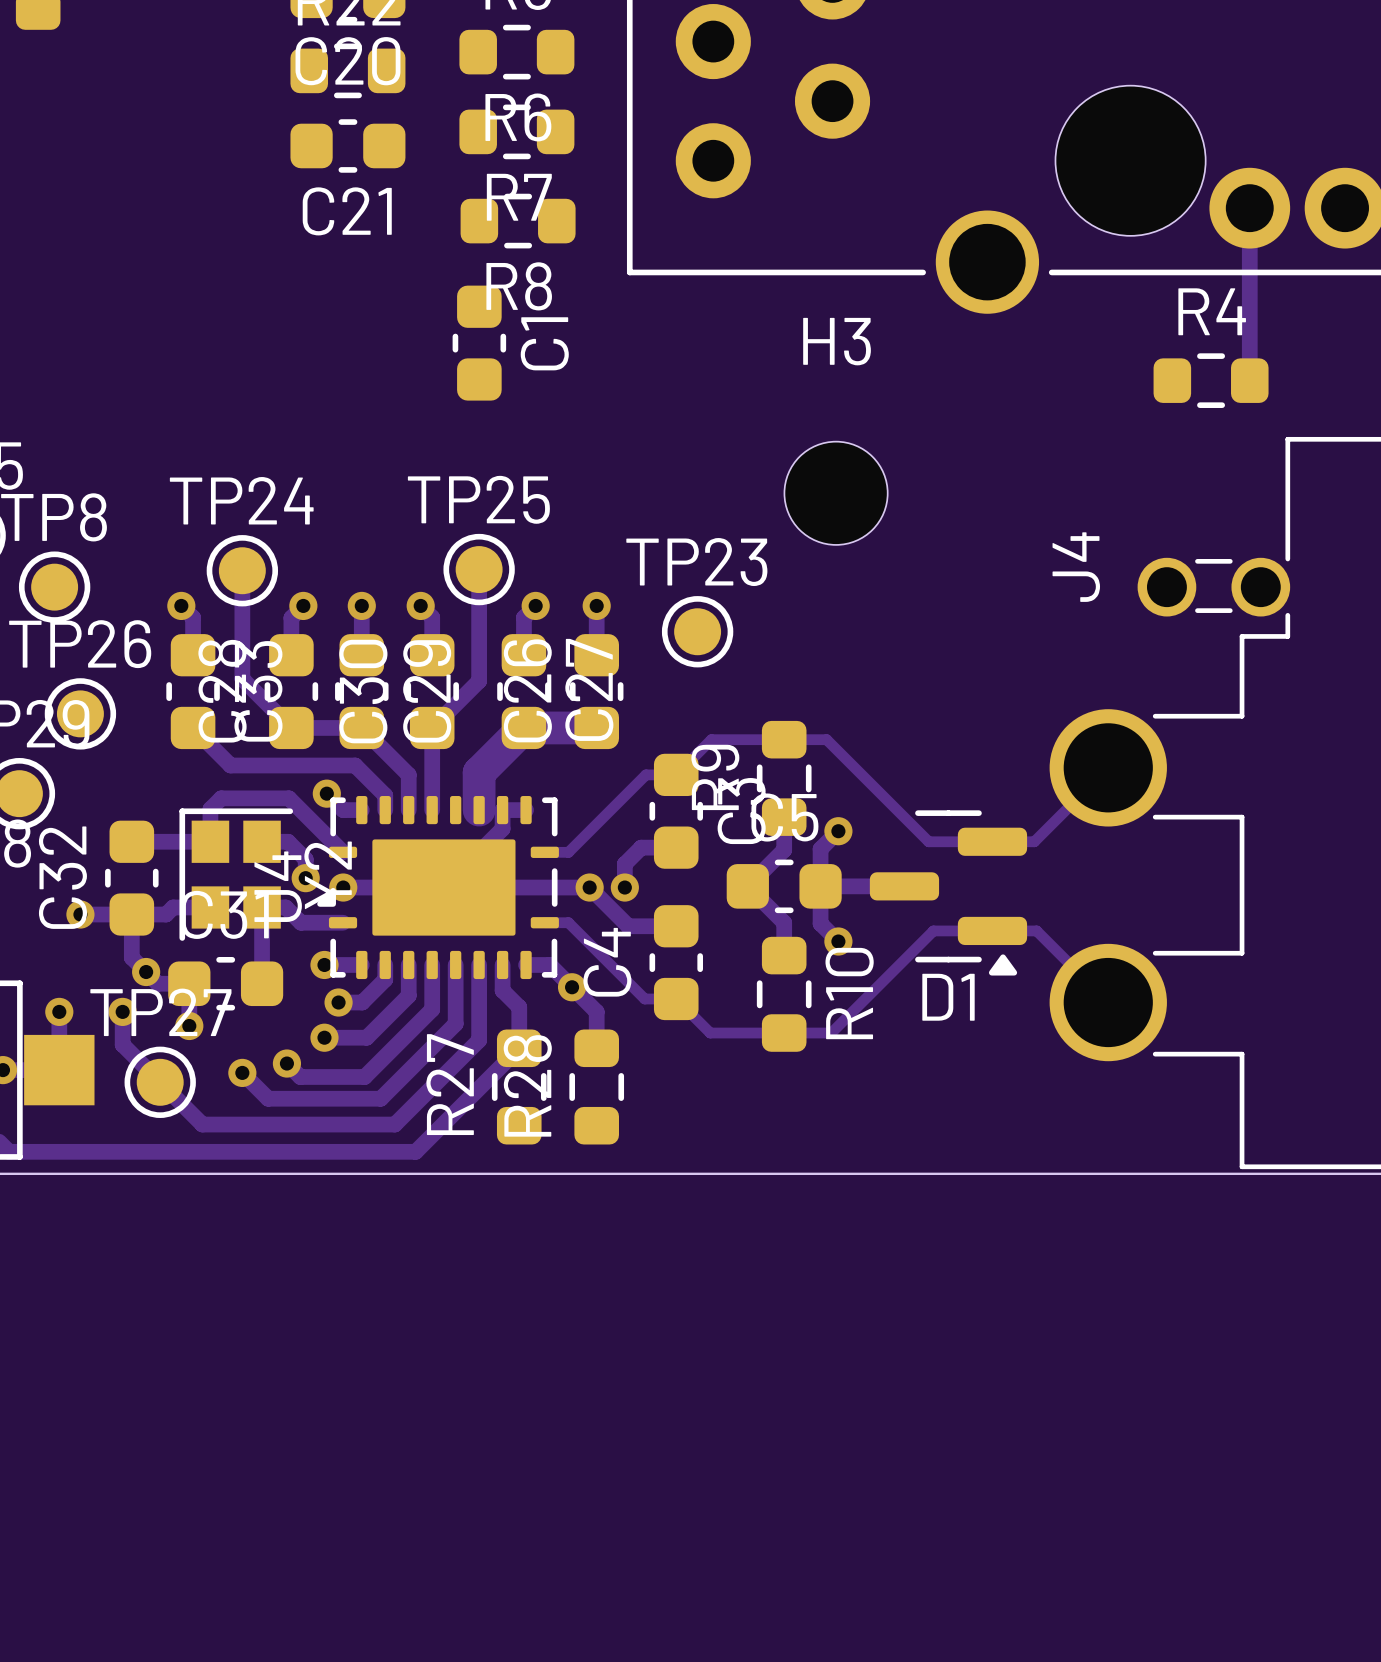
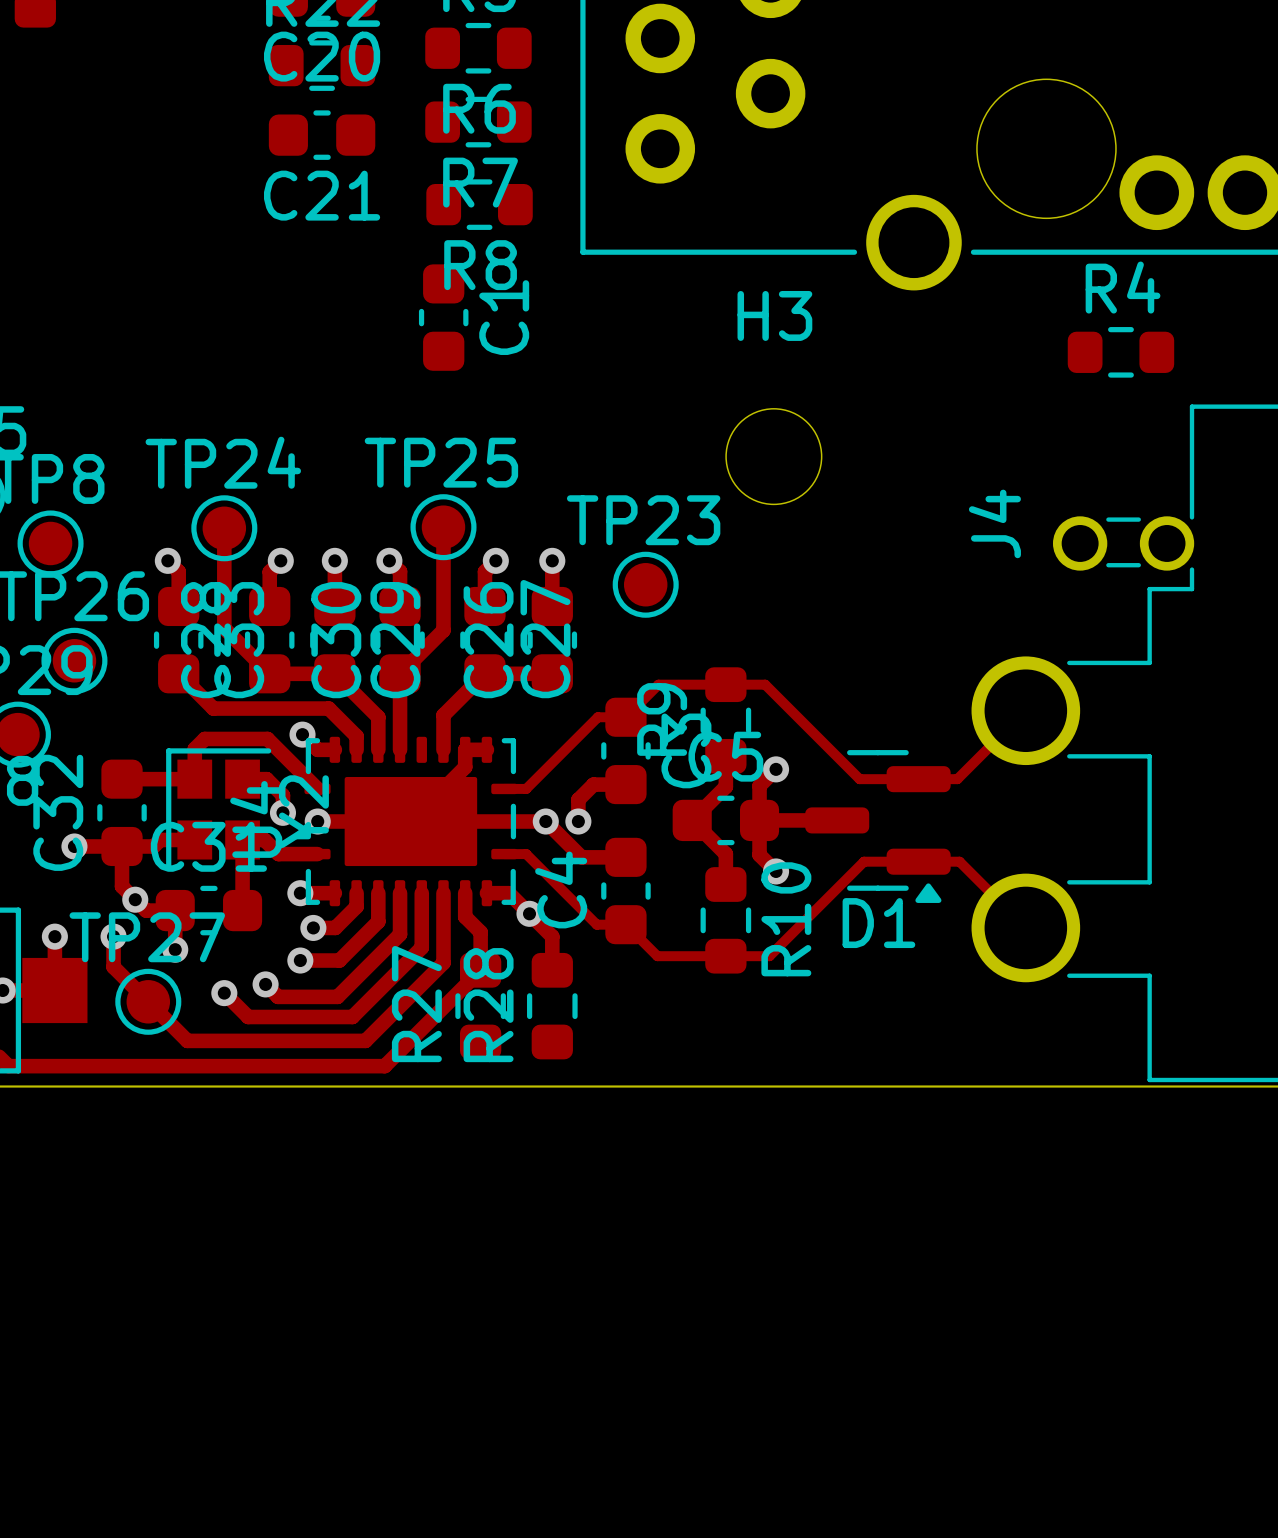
track: (1249, 208) (1249, 380) -> none
track width: thick (596, 727) (523, 727) (479, 772) (479, 810) -> thin (552, 673) (484, 673) (443, 715) (443, 749)

